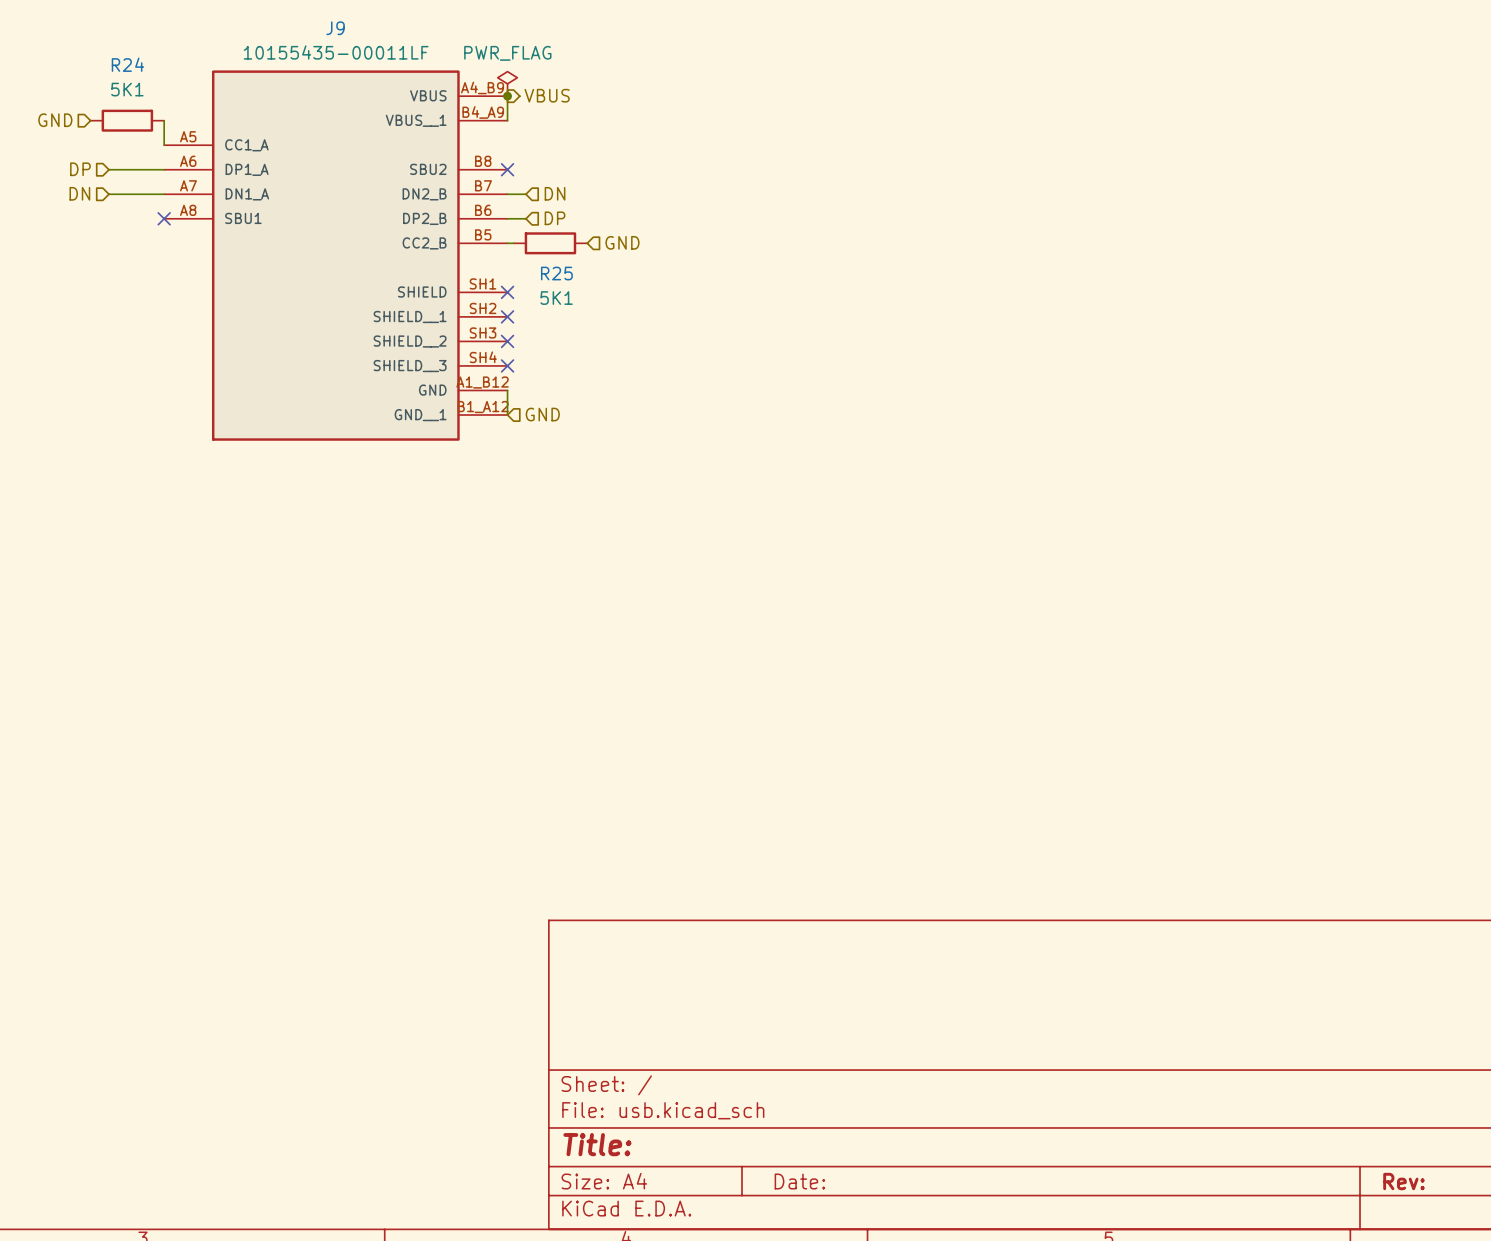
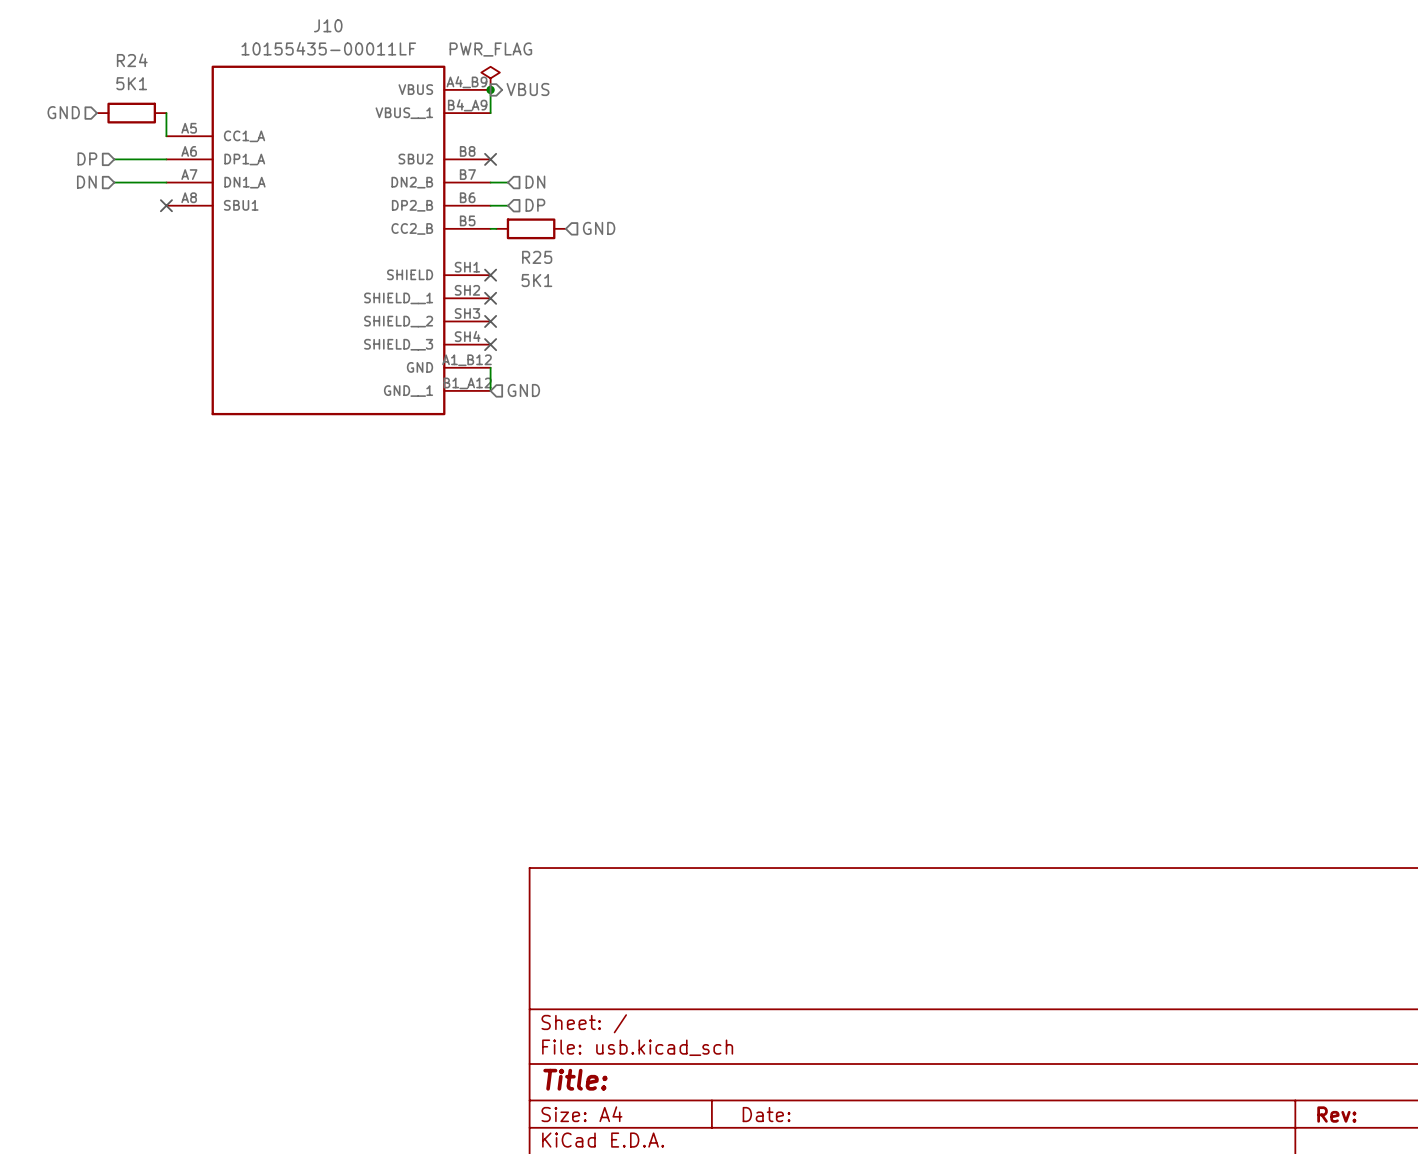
J9 name: J9 (335, 28) -> J10 (328, 25)

